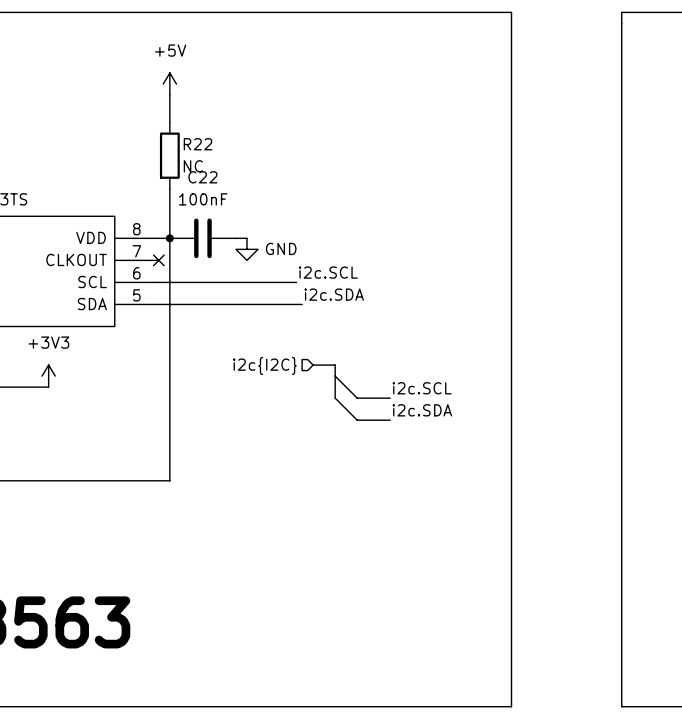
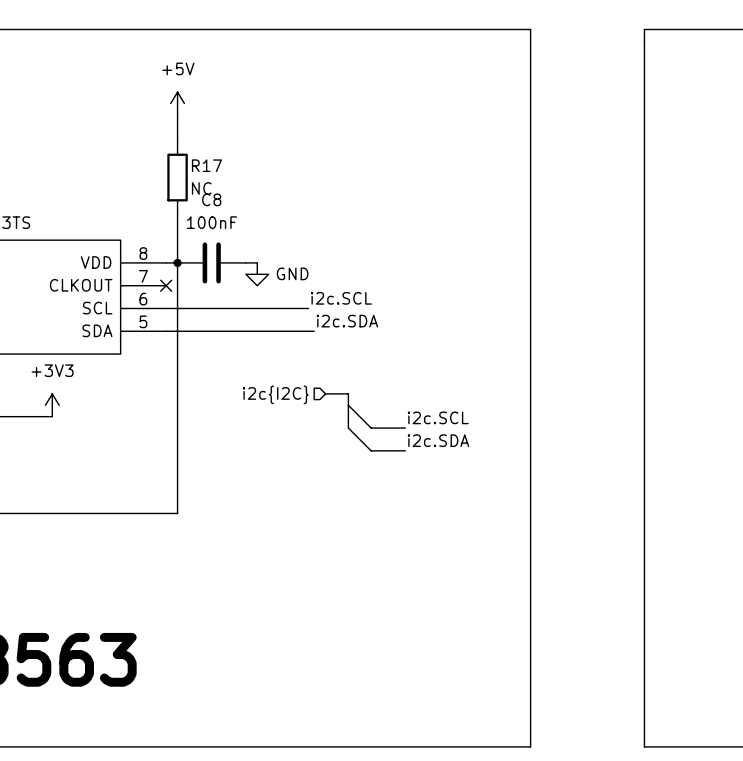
R22 name: R22 (198, 144) -> R17 (206, 165)
C22 name: C22 (202, 177) -> C8 (211, 199)

